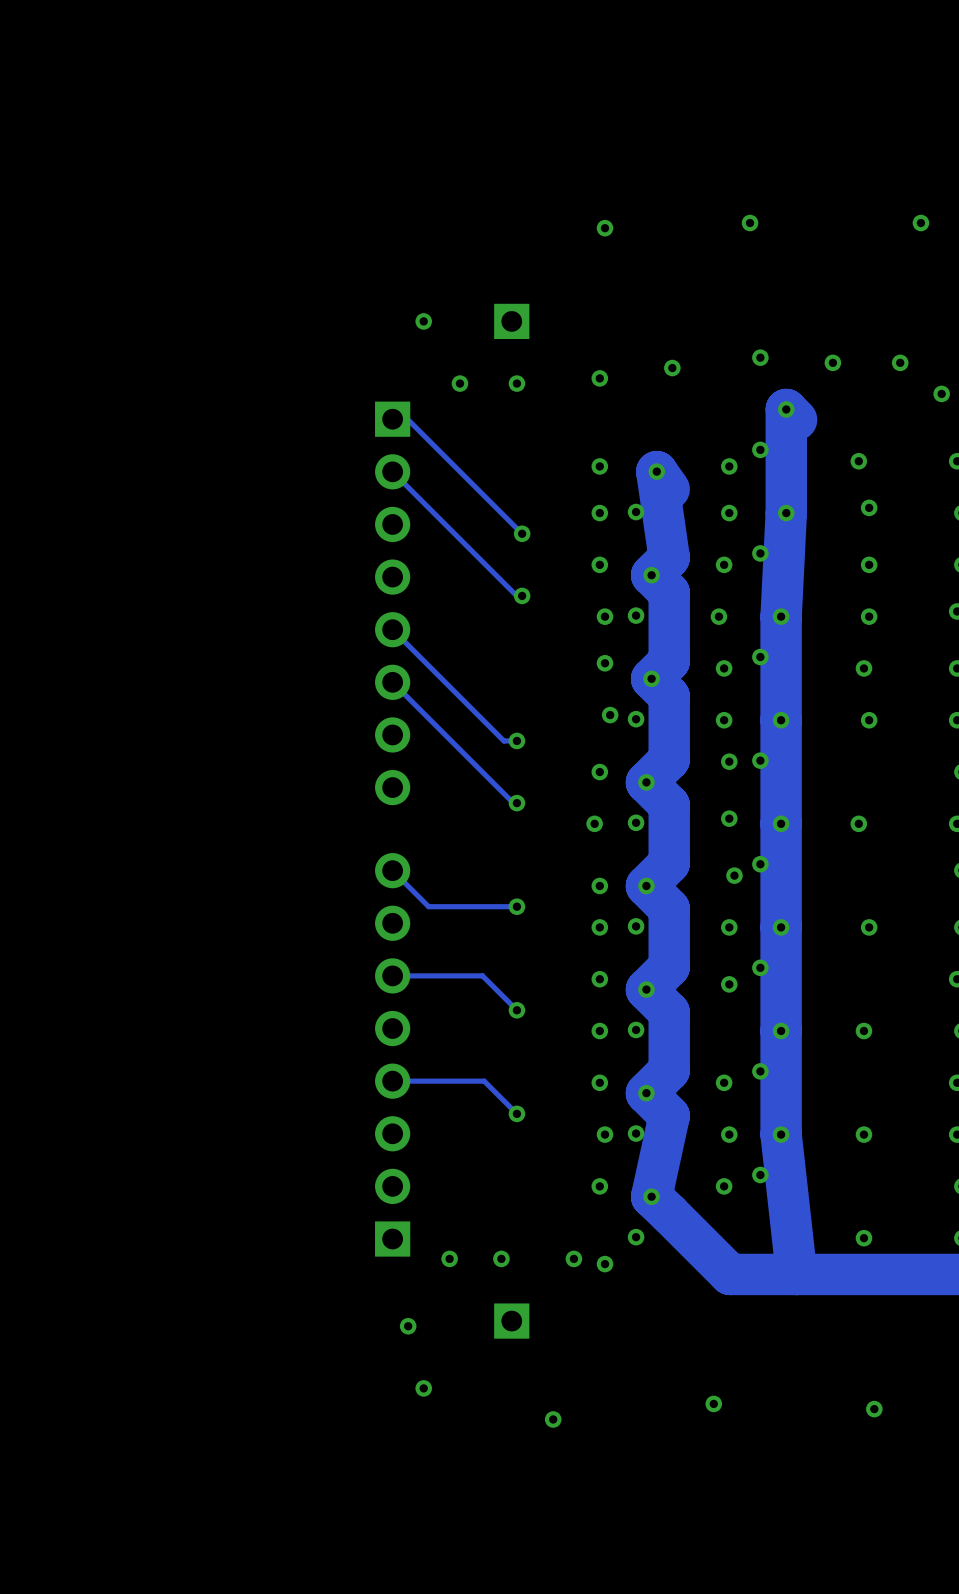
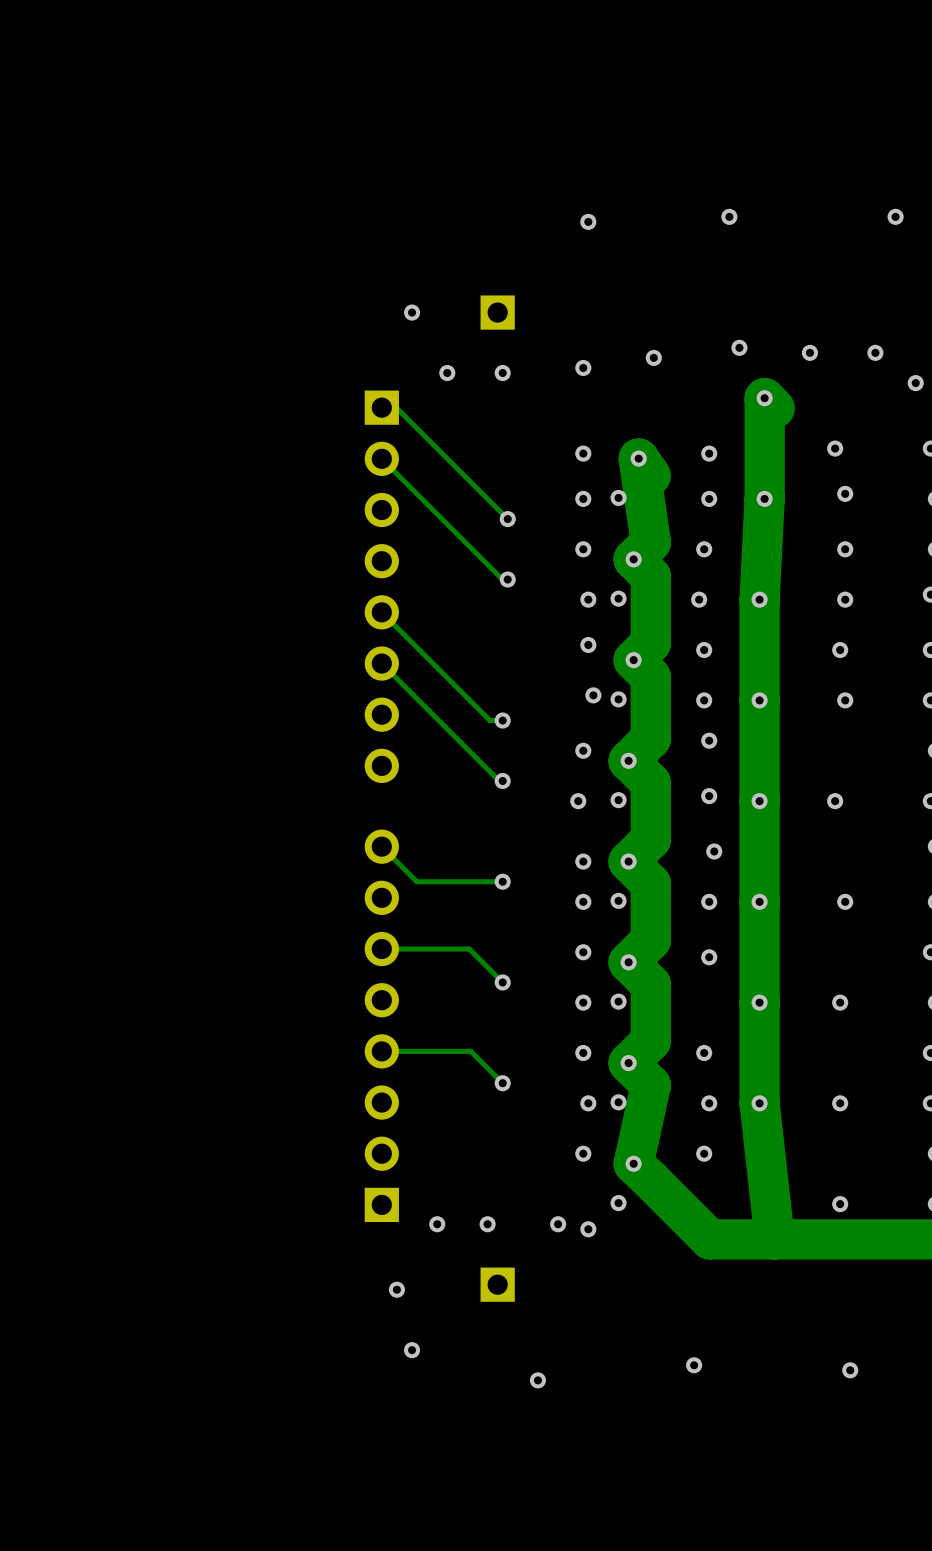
via: (760, 449) -> none
via: (760, 553) -> none
via: (760, 657) -> none
via: (760, 760) -> none
via: (760, 864) -> none
via: (760, 967) -> none
via: (760, 1071) -> none
via: (760, 1175) -> none

